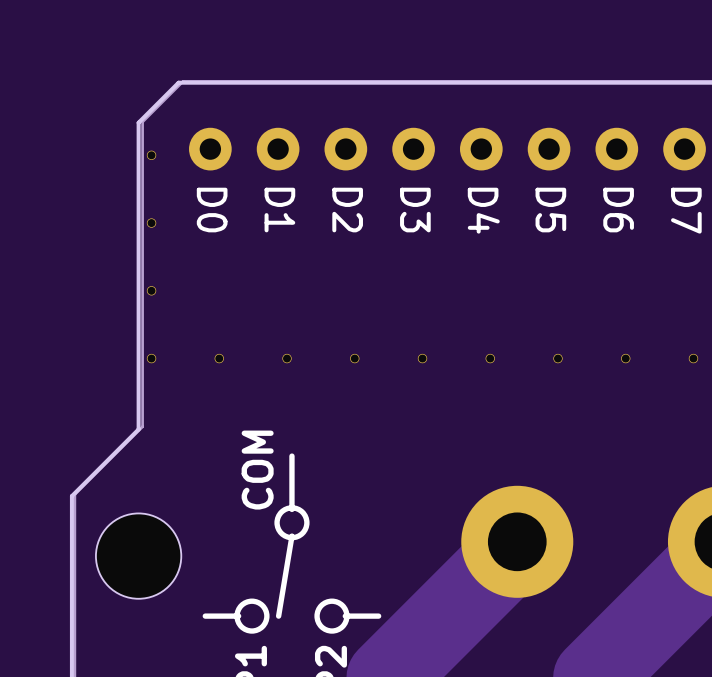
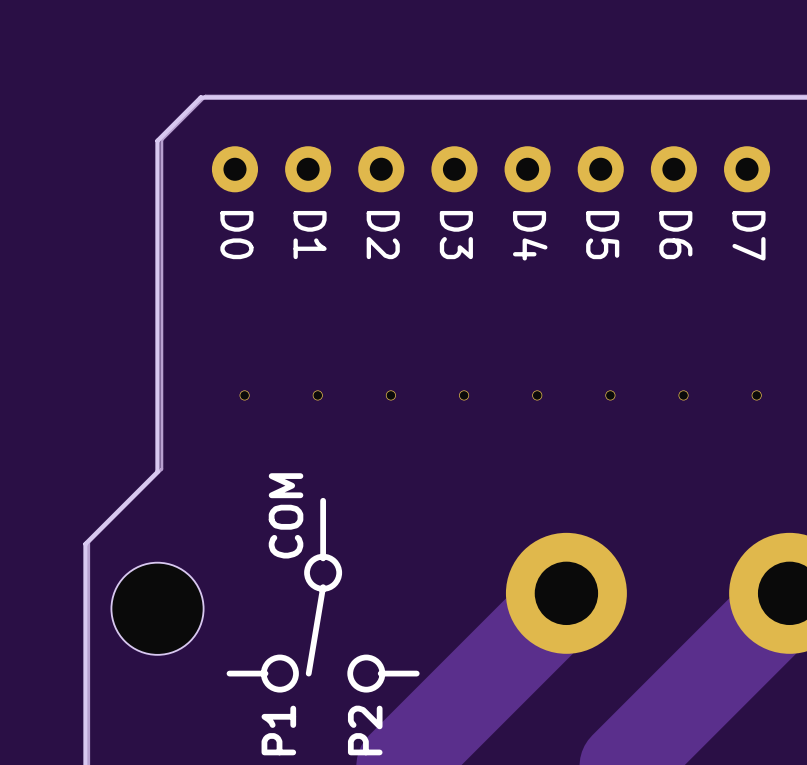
part: (151, 155) -> none
part: (151, 223) -> none
part: (151, 290) -> none
part: (151, 358) -> none

